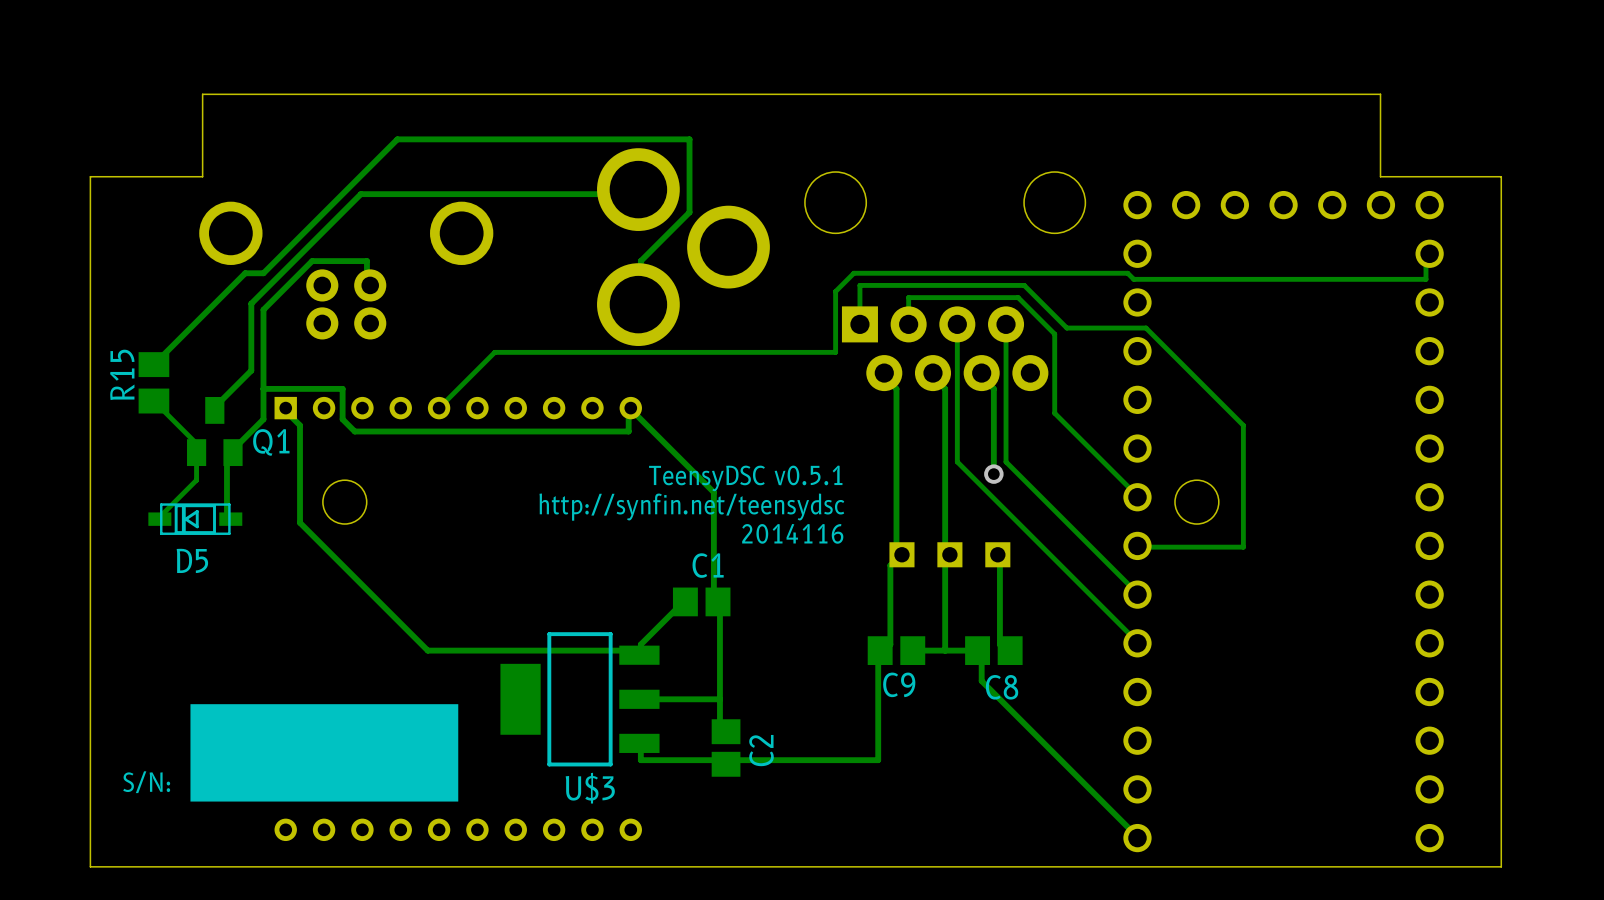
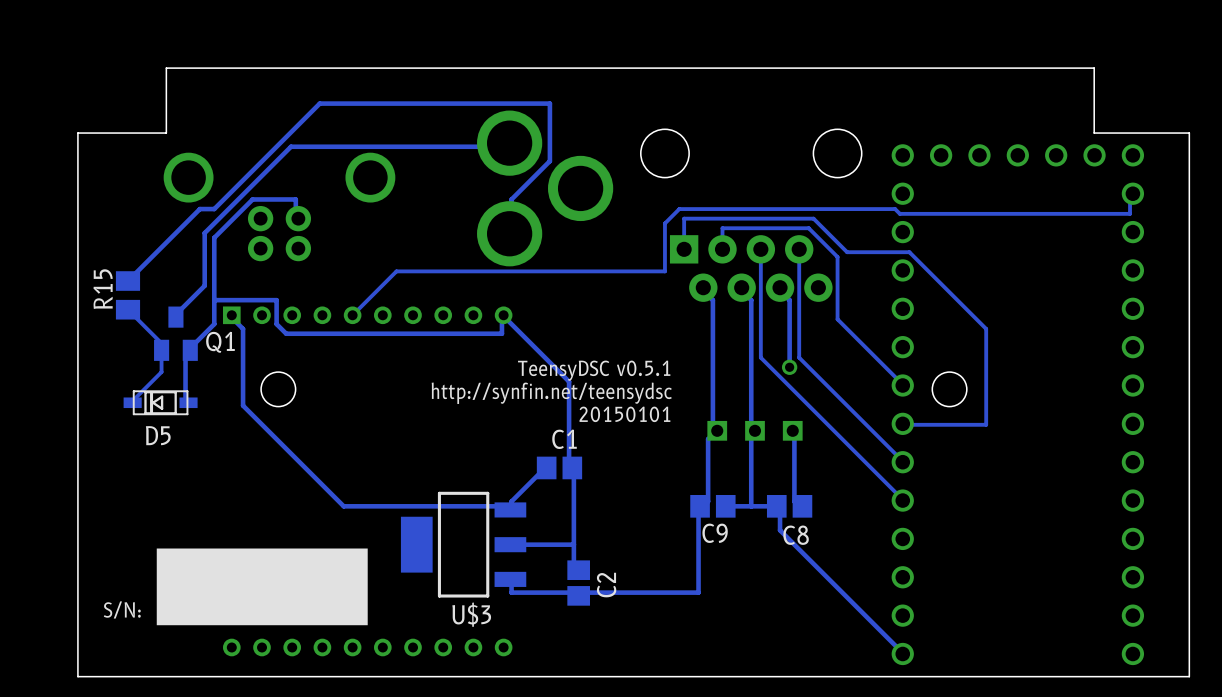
text: 2014116 (792, 533) -> 20150101 (624, 414)

